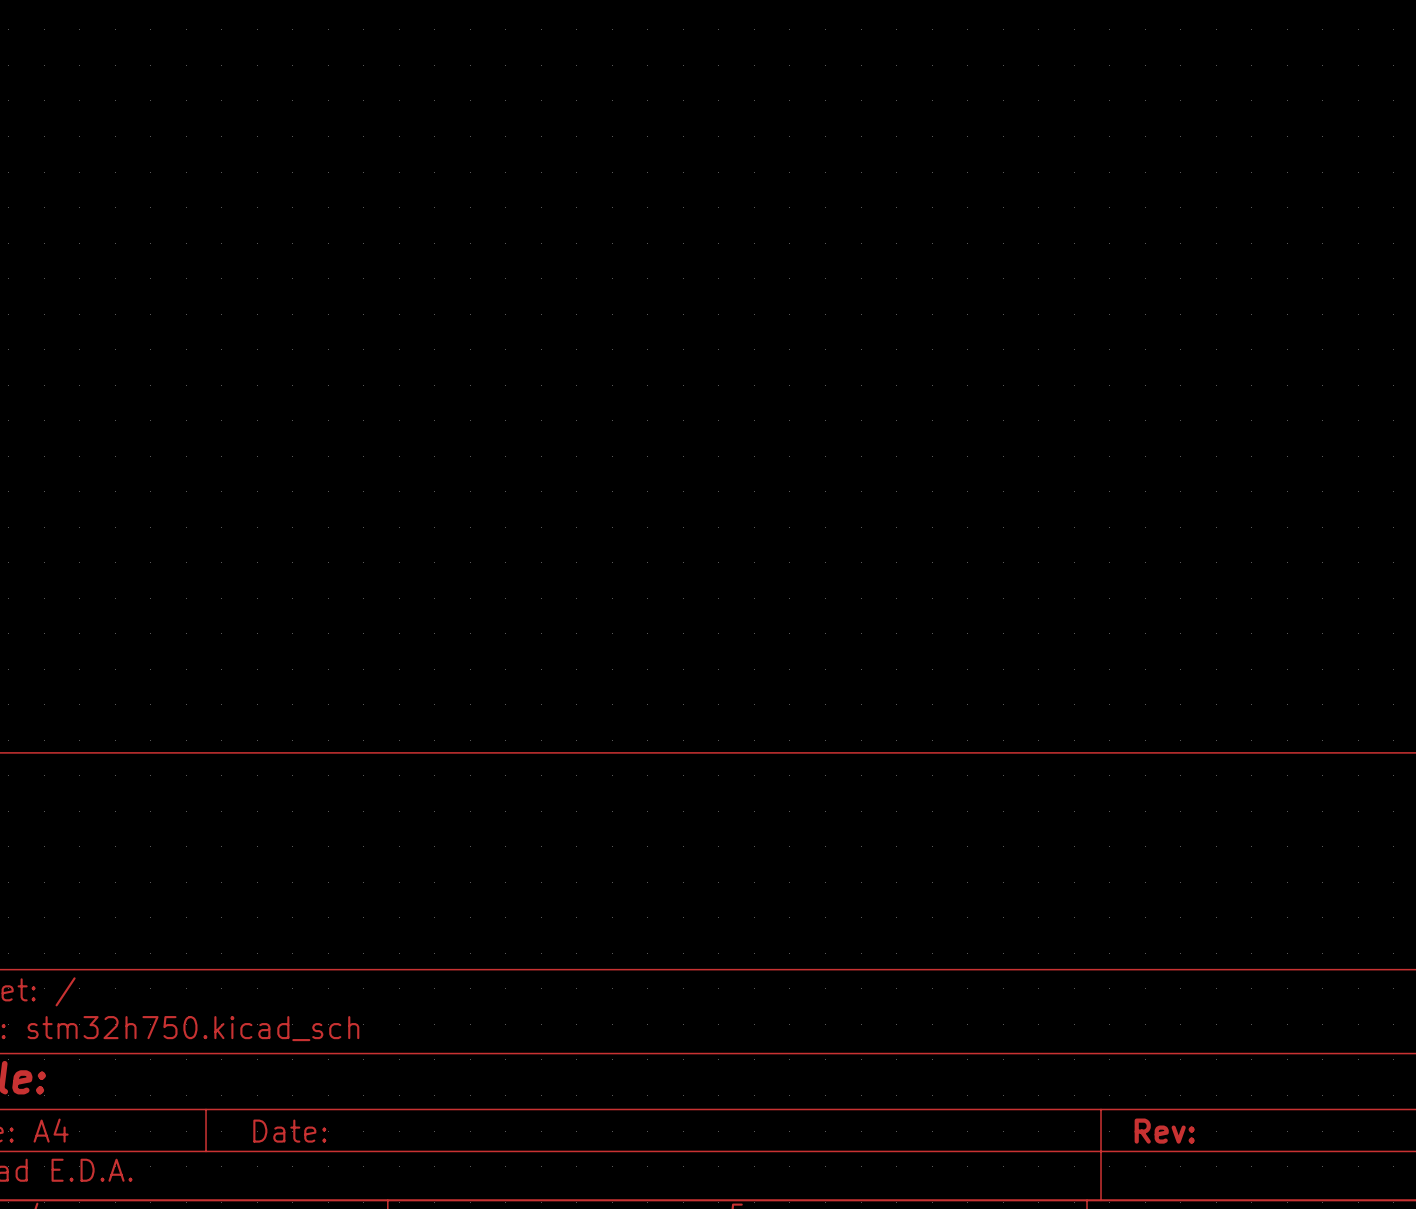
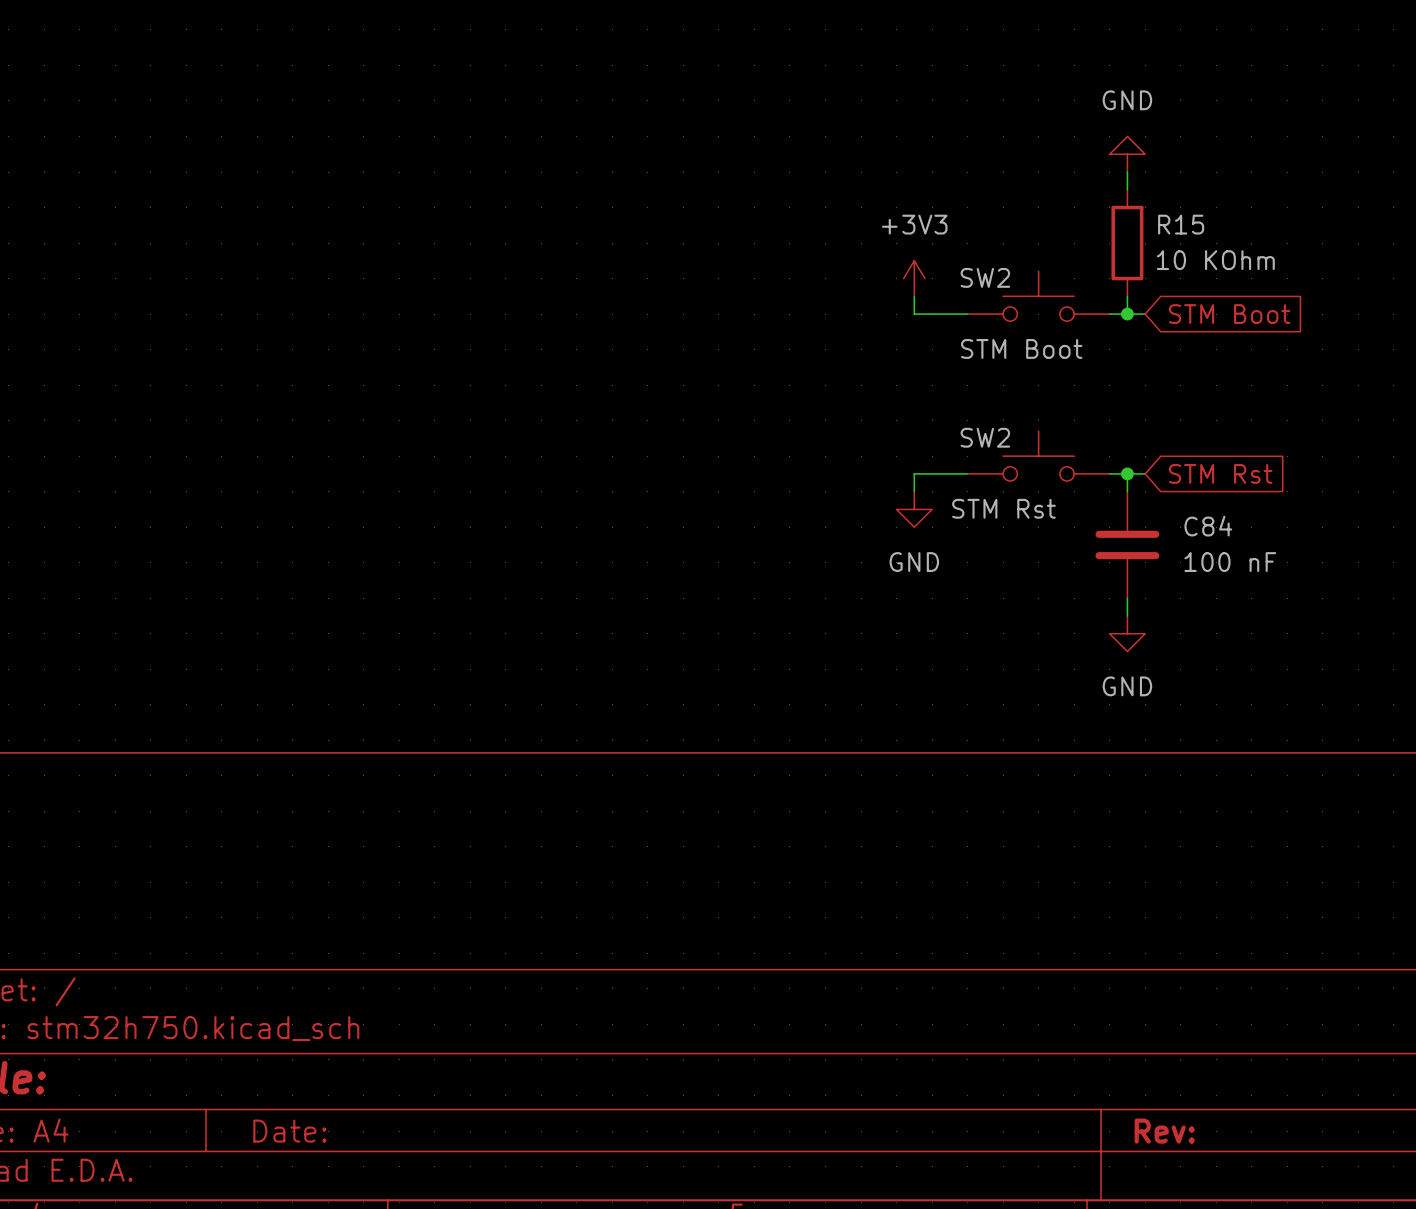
power symbol: none -> GND (1127, 154)
wire: none -> (1127, 172) (1127, 189)
R15: none -> 10 KOhm (1127, 243)
power symbol: none -> +3V3 (914, 278)
wire: none -> (914, 296) (914, 314) (967, 314)
SW2: none -> STM Boot (1038, 296)
wire: none -> (1127, 296) (1127, 314)
wire: none -> (1109, 314) (1145, 314)
junction: none -> (1127, 314)
global label: none -> STM Boot (1229, 314)
SW2: none -> STM Rst (1038, 456)
wire: none -> (967, 473) (914, 473) (914, 491)
wire: none -> (1109, 473) (1145, 473)
wire: none -> (1127, 473) (1127, 491)
junction: none -> (1127, 473)
global label: none -> STM Rst (1220, 473)
power symbol: none -> GND (914, 509)
C84: none -> 100 nF (1127, 544)
wire: none -> (1127, 598) (1127, 615)
power symbol: none -> GND (1127, 633)

